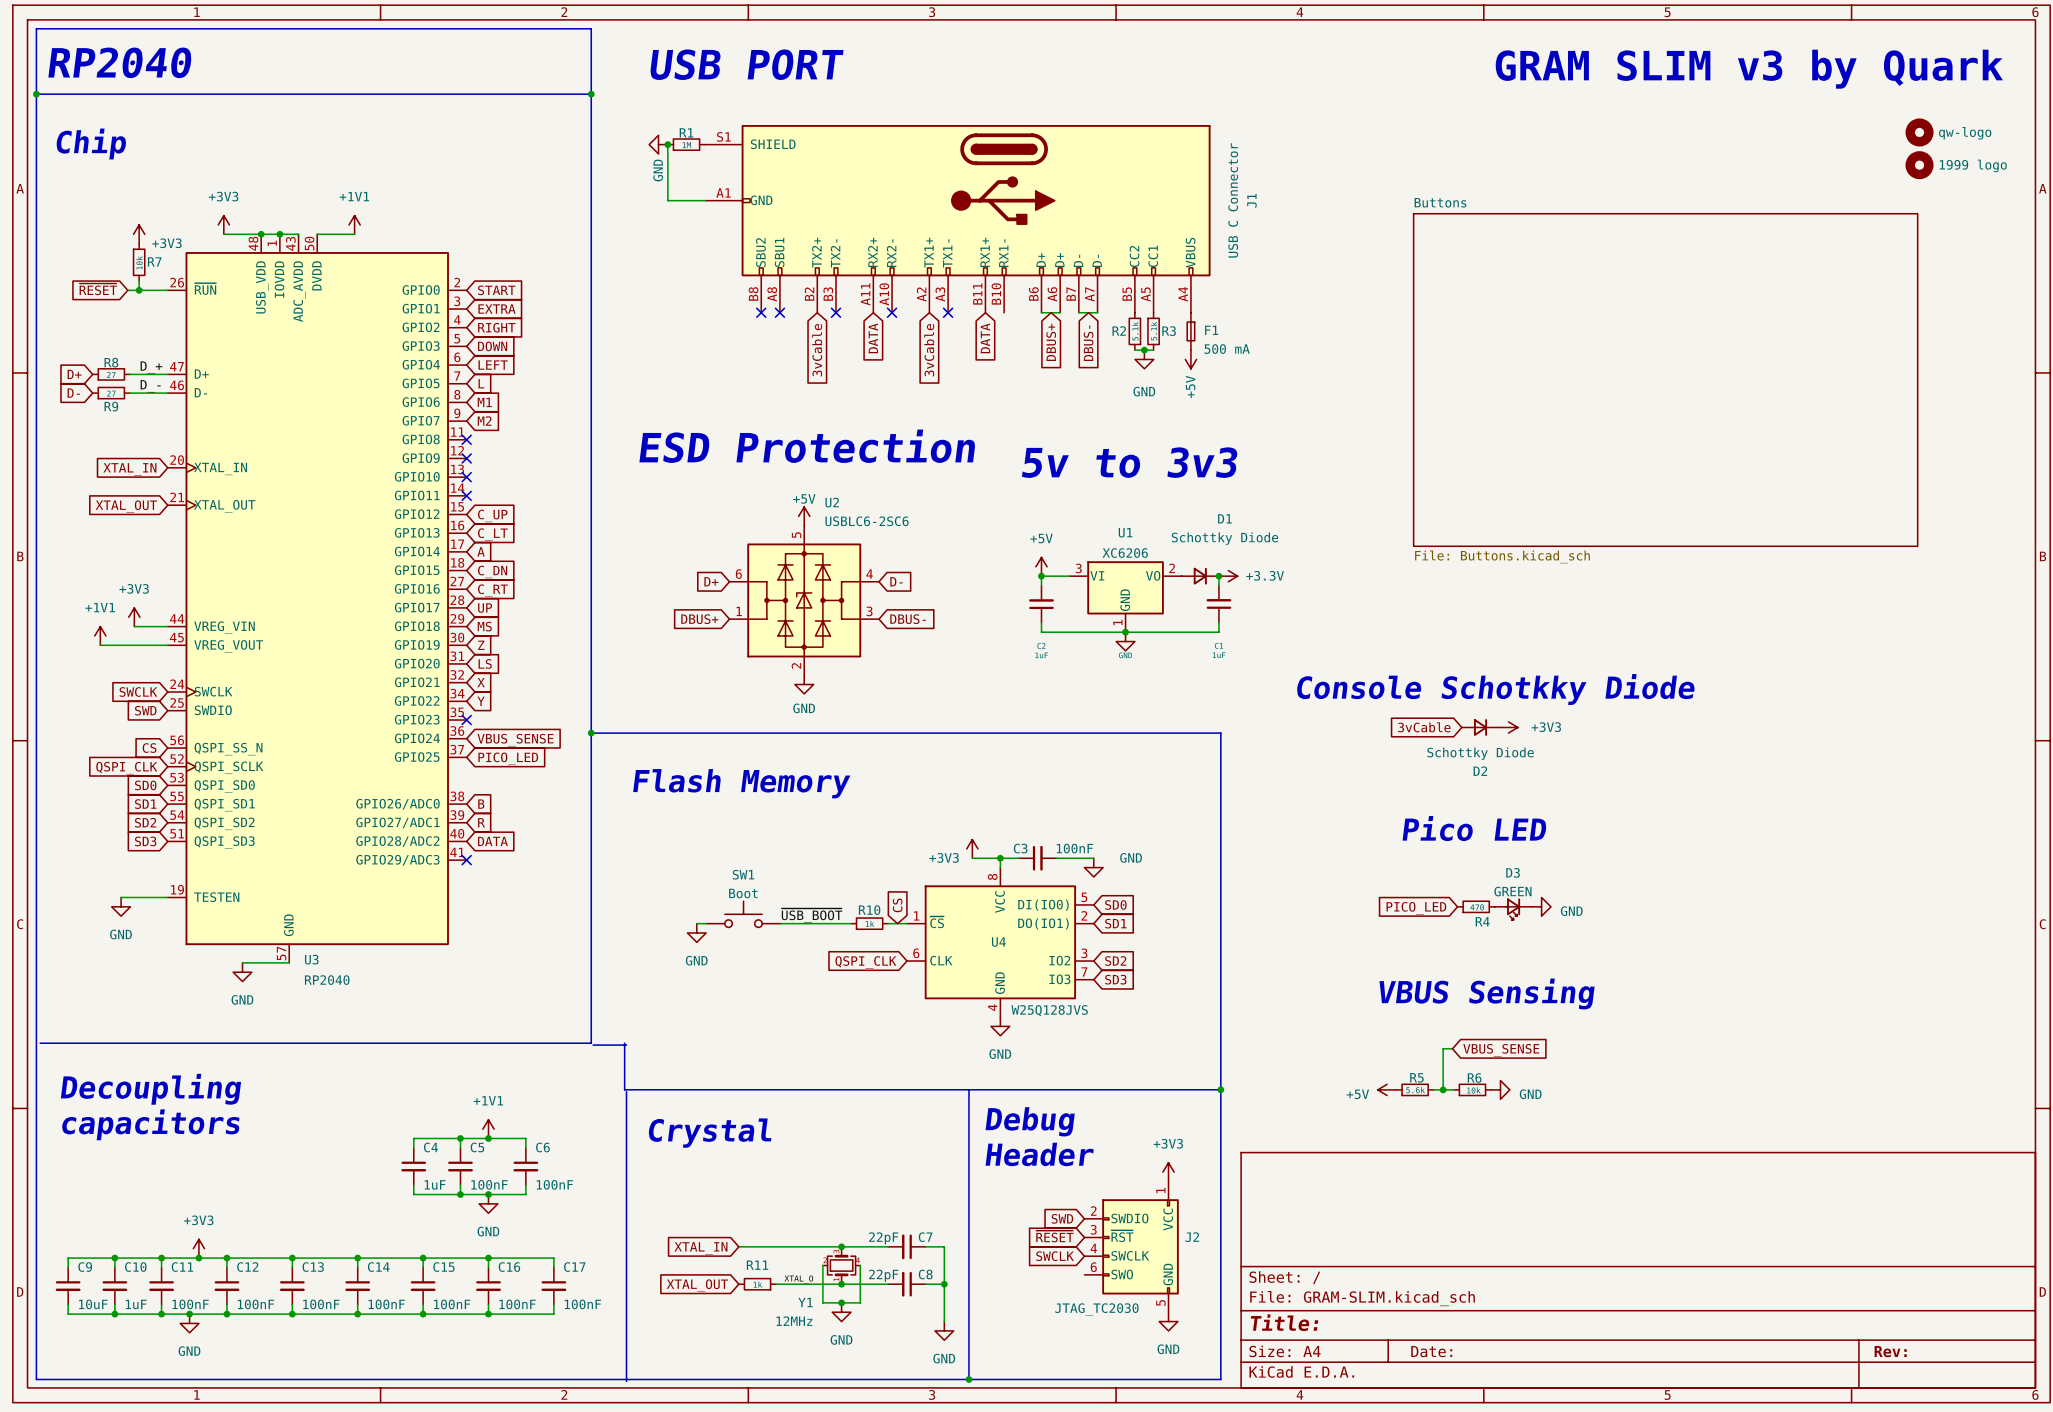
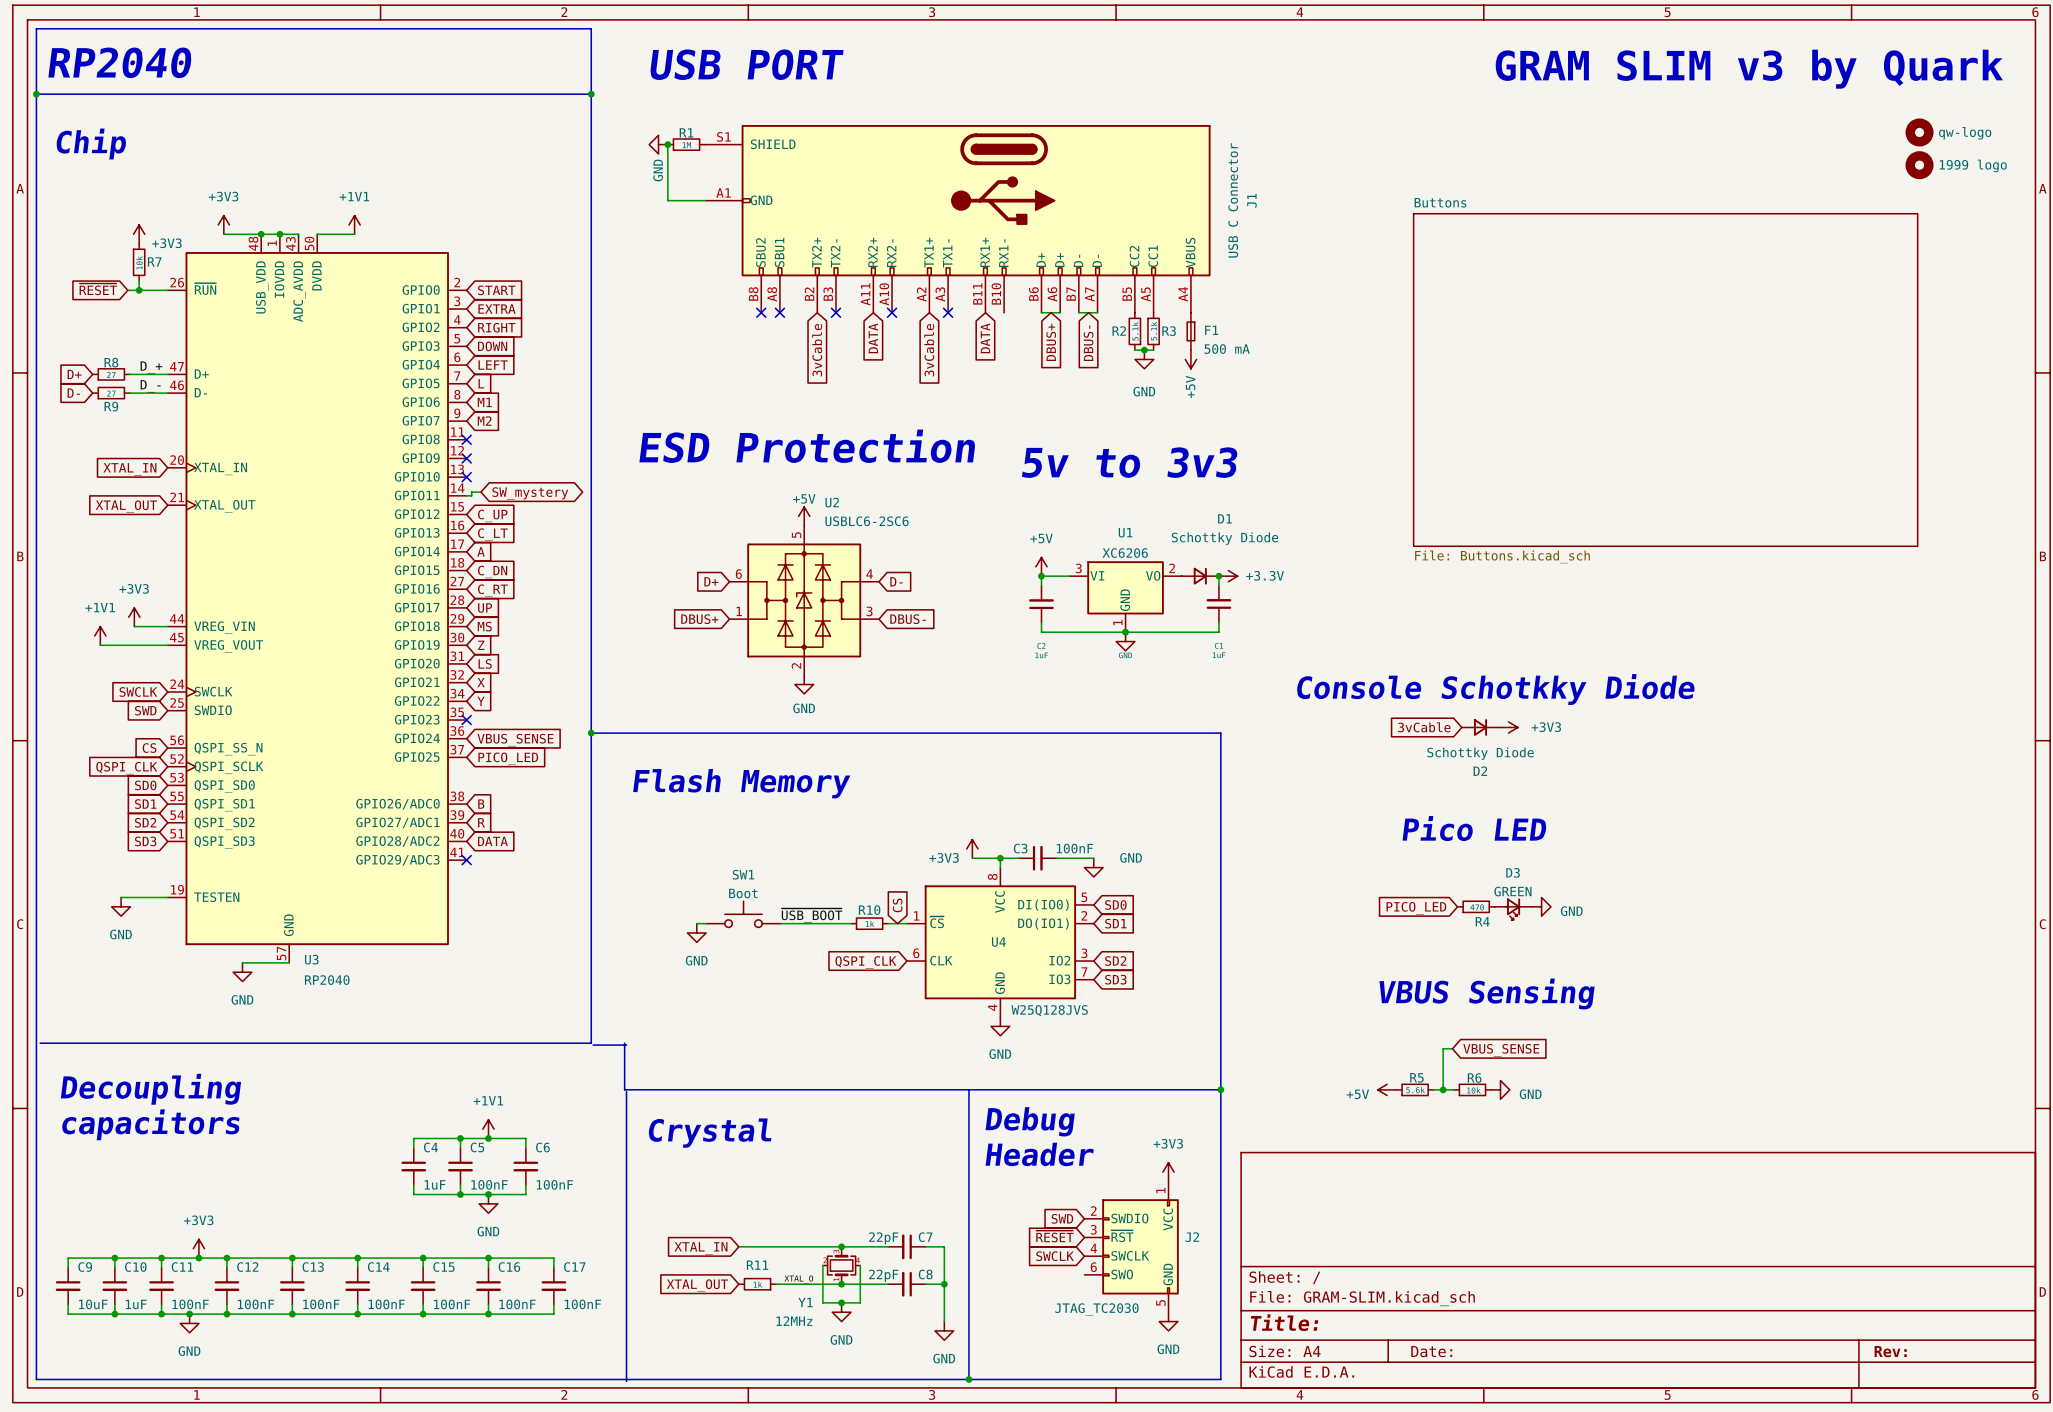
wire: none -> (481, 492) (471, 492) (471, 495) (466, 495)
global label: none -> SW_mystery (530, 493)
no-connect mark: (466, 495) -> none

